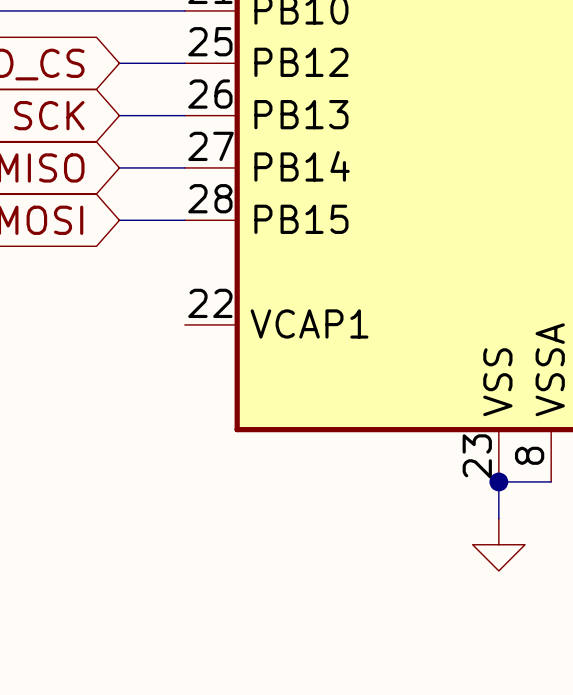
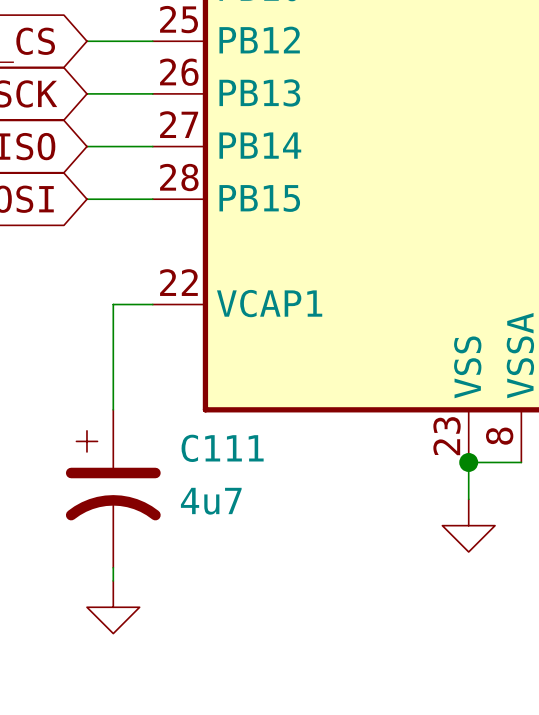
wire: none -> (152, 304) (113, 304) (113, 409)
C111: none -> 4u7 (113, 488)
wire: none -> (113, 567) (113, 580)
power symbol: none -> (113, 607)

